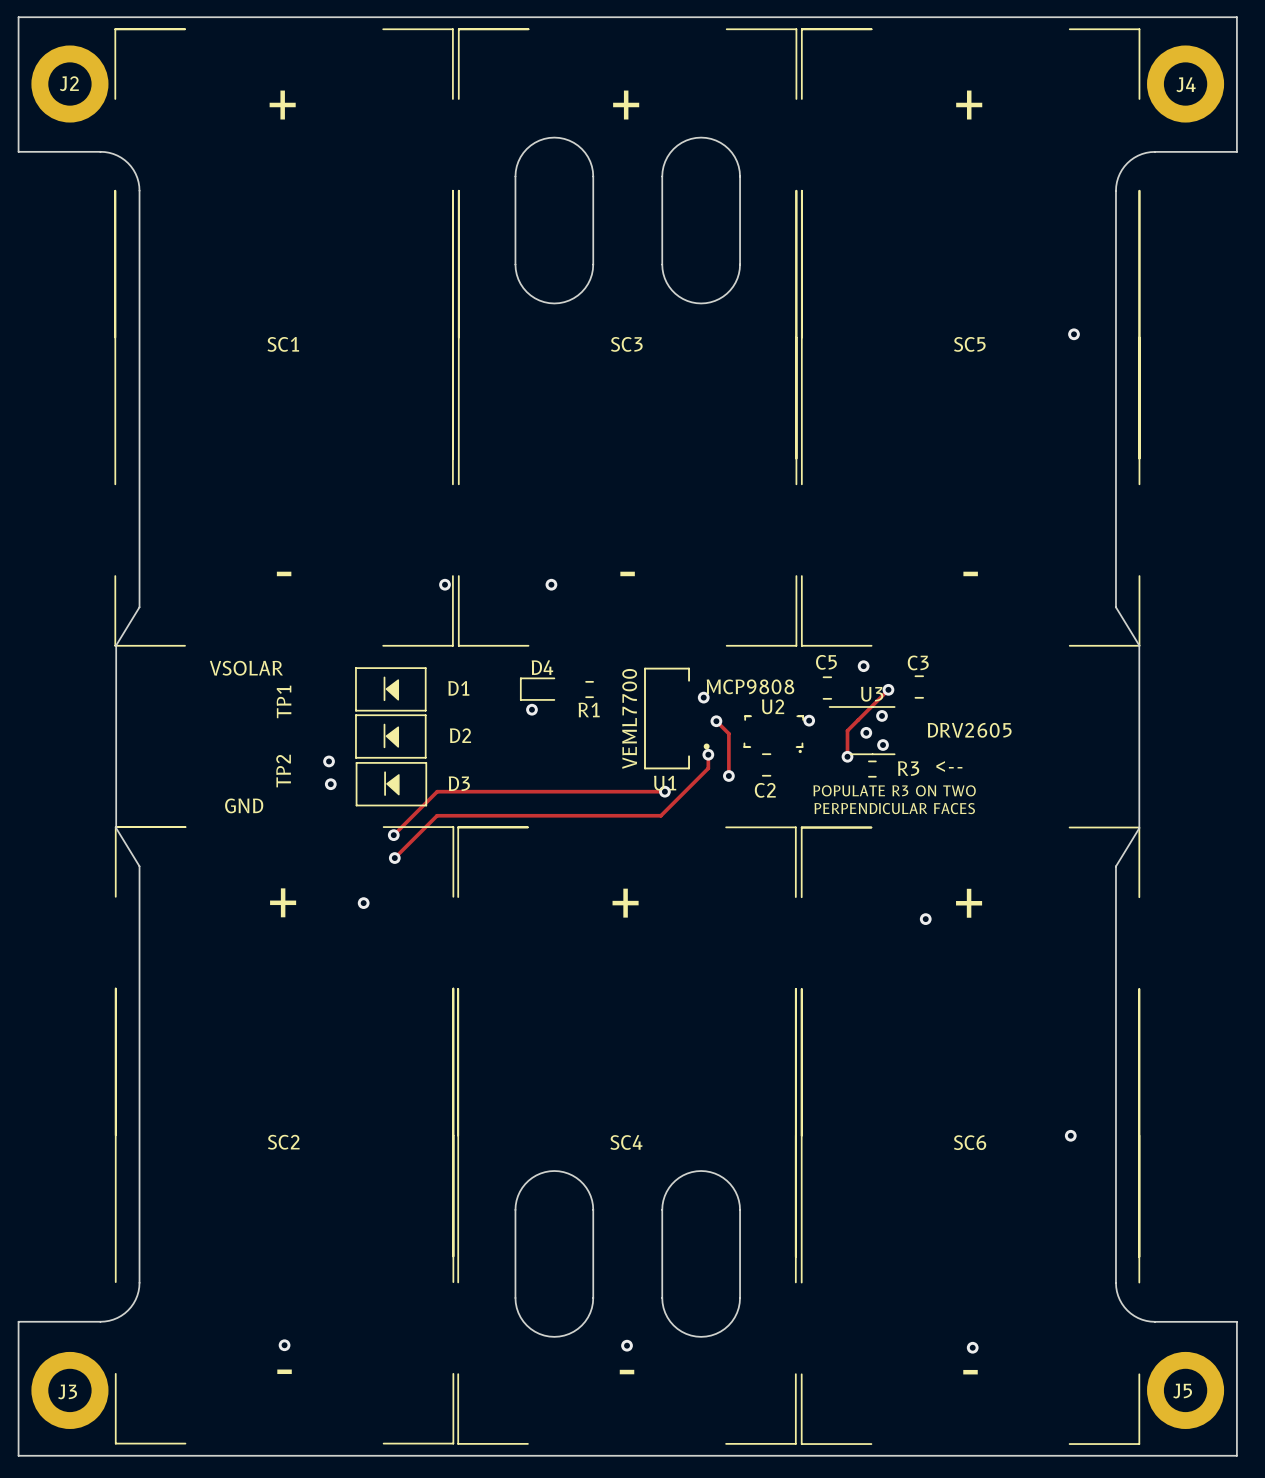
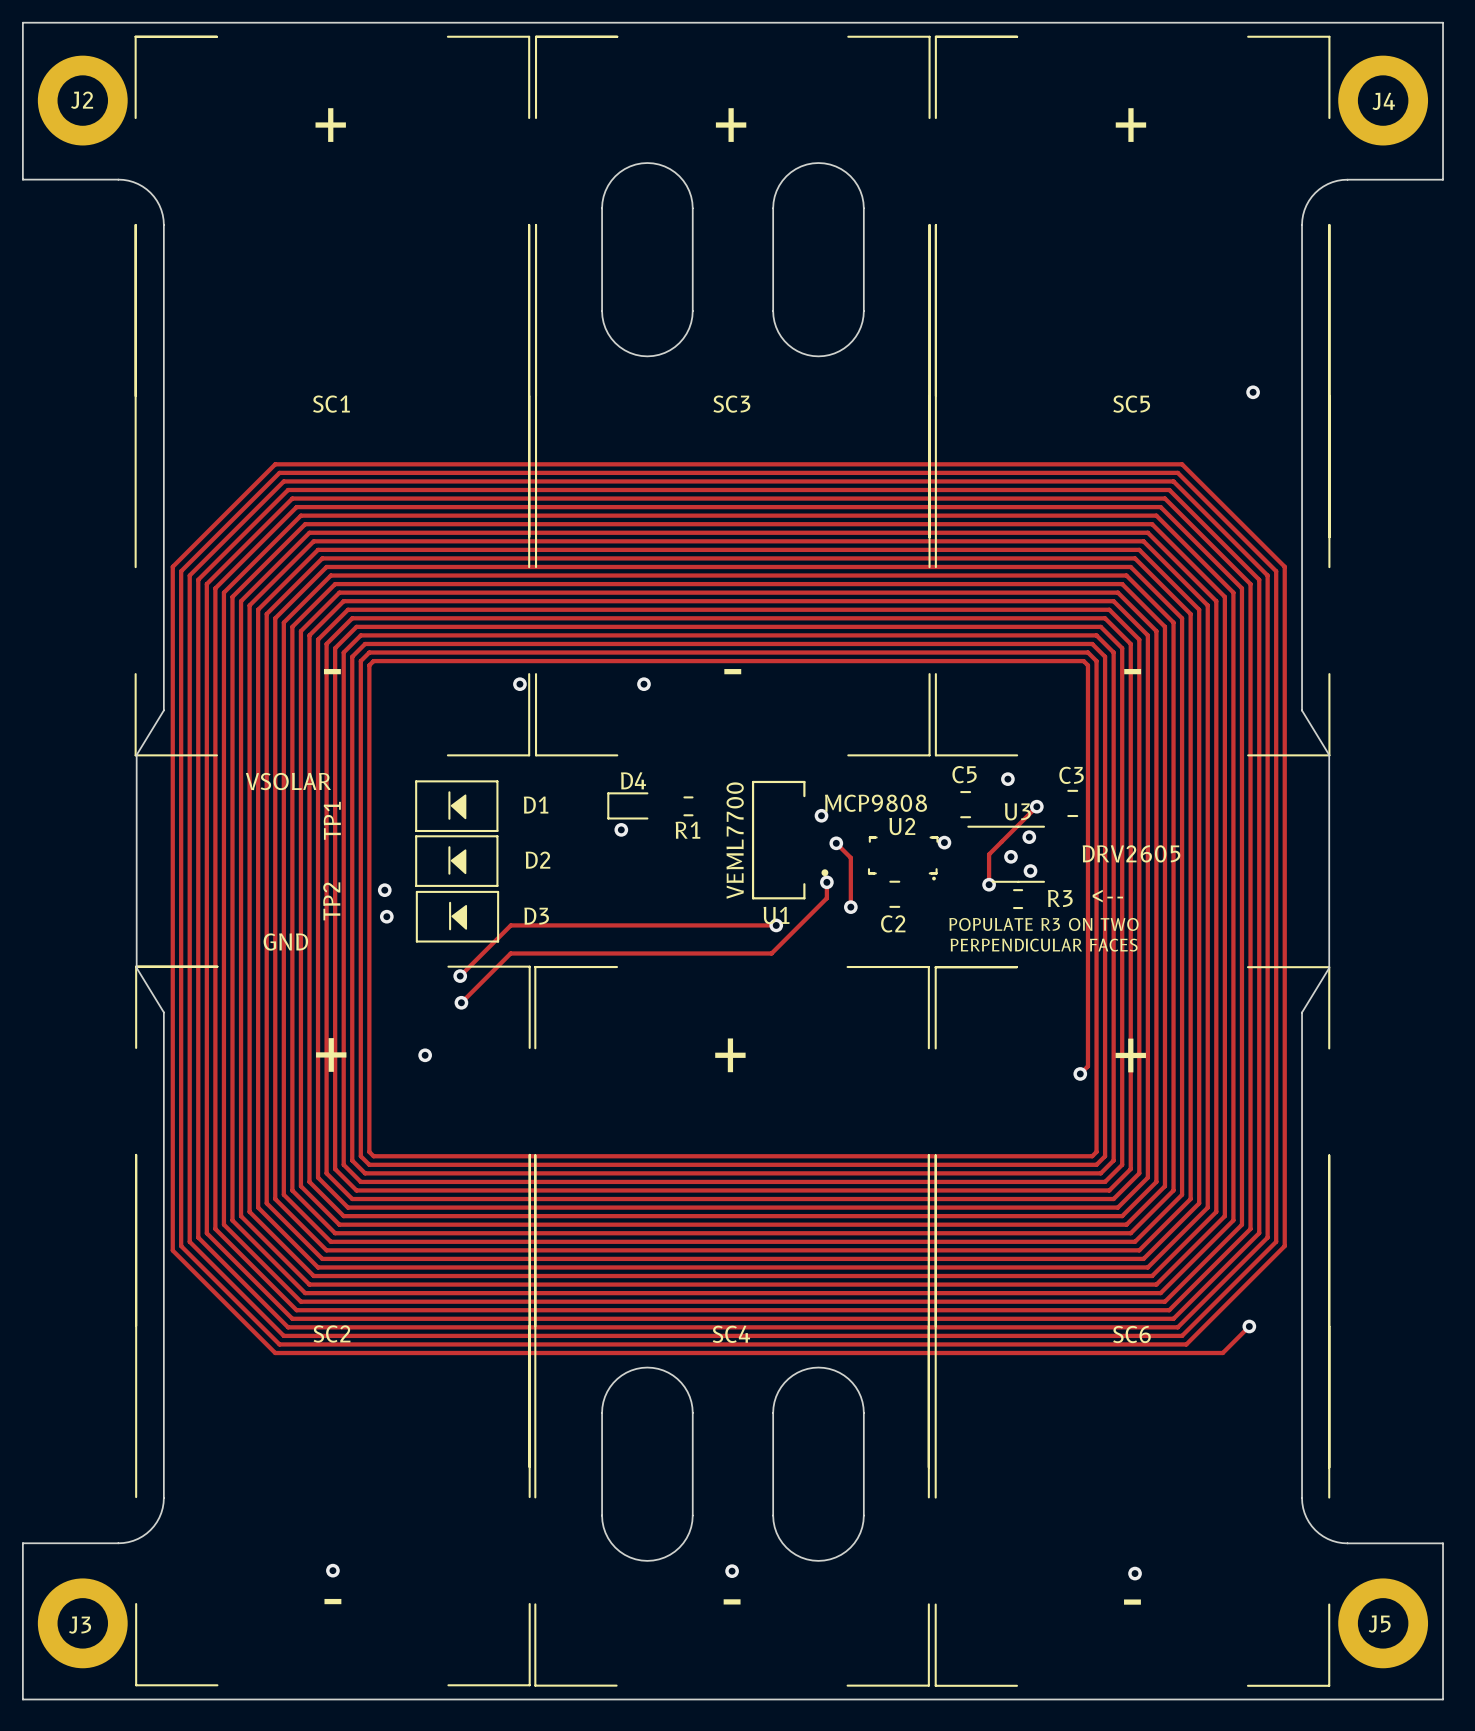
track: none -> (1080, 1073) (1087, 1066) (1087, 665) (1083, 661) (373, 661) (369, 665) (369, 1151) (373, 1156) (1092, 1156) (1096, 1151) (1096, 661) (1087, 652) (369, 652) (360, 661) (360, 1156) (369, 1164) (1096, 1164) (1105, 1156) (1105, 656) (1092, 643) (365, 643) (352, 656) (352, 1160) (365, 1173) (1100, 1173) (1113, 1160) (1113, 652) (1096, 635) (360, 635) (343, 652) (343, 1164) (360, 1181) (1105, 1181) (1122, 1164) (1122, 648) (1100, 626) (356, 626) (335, 648) (335, 1169) (356, 1190) (1109, 1190) (1130, 1169) (1130, 643) (1105, 618) (352, 618) (326, 643) (326, 1173) (352, 1199) (1113, 1199) (1139, 1173) (1139, 639) (1109, 609) (347, 609) (318, 639) (318, 1177) (347, 1207) (1117, 1207) (1147, 1177) (1147, 635) (1113, 601) (343, 601) (309, 635) (309, 1181) (343, 1216) (1122, 1216) (1156, 1181) (1156, 631) (1117, 592) (339, 592) (300, 631) (300, 1186) (339, 1224) (1126, 1224) (1164, 1186) (1164, 626) (1122, 584) (335, 584) (292, 626) (292, 1190) (335, 1233) (1130, 1233) (1173, 1190) (1173, 622) (1126, 575) (330, 575) (283, 622) (283, 1194) (330, 1241) (1135, 1241) (1182, 1194) (1182, 618) (1130, 566) (326, 566) (275, 618) (275, 1199) (326, 1250) (1139, 1250) (1190, 1199) (1190, 614) (1135, 558) (322, 558) (266, 614) (266, 1203) (322, 1258) (1143, 1258) (1199, 1203) (1199, 609) (1139, 549) (318, 549) (258, 609) (258, 1207) (318, 1267) (1147, 1267) (1207, 1207) (1207, 605) (1143, 541) (313, 541) (249, 605) (249, 1211) (313, 1276) (1152, 1276) (1216, 1211) (1216, 601) (1147, 532) (309, 532) (241, 601) (241, 1216) (309, 1284) (1156, 1284) (1224, 1216) (1224, 596) (1152, 524) (305, 524) (232, 596) (232, 1220) (305, 1293) (1160, 1293) (1233, 1220) (1233, 592) (1156, 515) (300, 515) (223, 592) (223, 1224) (300, 1301) (1164, 1301) (1241, 1224) (1241, 588) (1160, 507) (296, 507) (215, 588) (215, 1228) (296, 1310) (1169, 1310) (1250, 1228) (1250, 584) (1164, 498) (292, 498) (206, 584) (206, 1233) (292, 1318) (1173, 1318) (1259, 1233) (1259, 579) (1169, 489) (288, 489) (198, 579) (198, 1237) (288, 1327) (1177, 1327) (1267, 1237) (1267, 575) (1173, 481) (283, 481) (189, 575) (189, 1241) (283, 1335) (1182, 1335) (1276, 1241) (1276, 571) (1177, 472) (279, 472) (181, 571) (181, 1246) (279, 1344) (1186, 1344) (1284, 1246) (1284, 566) (1182, 464) (275, 464) (172, 566) (172, 1250) (275, 1353) (1222, 1353) (1249, 1326)

